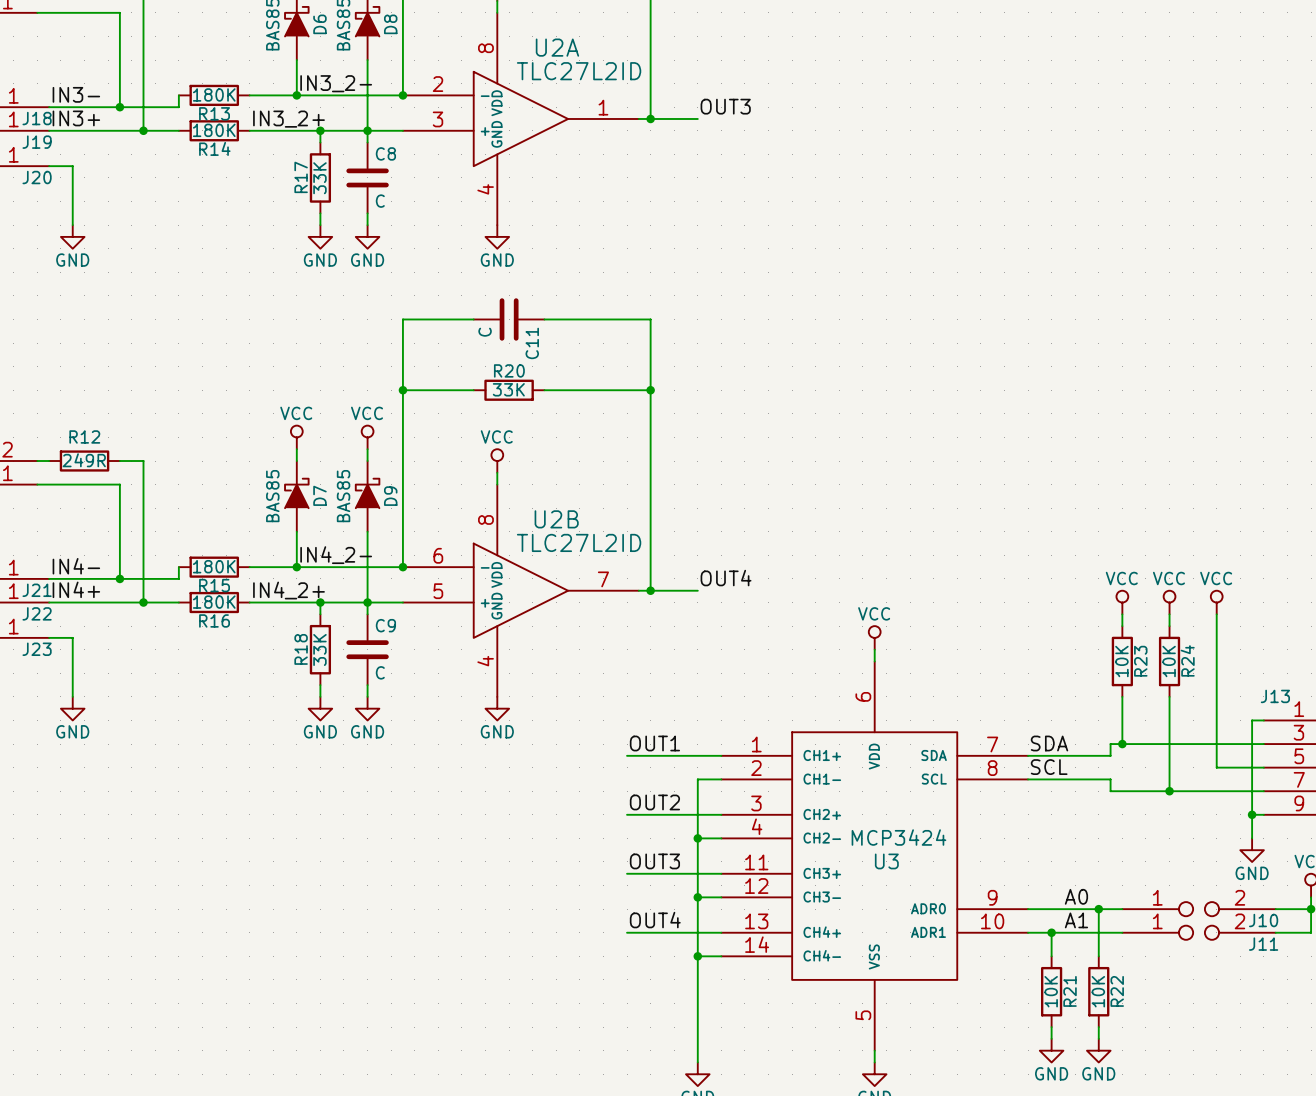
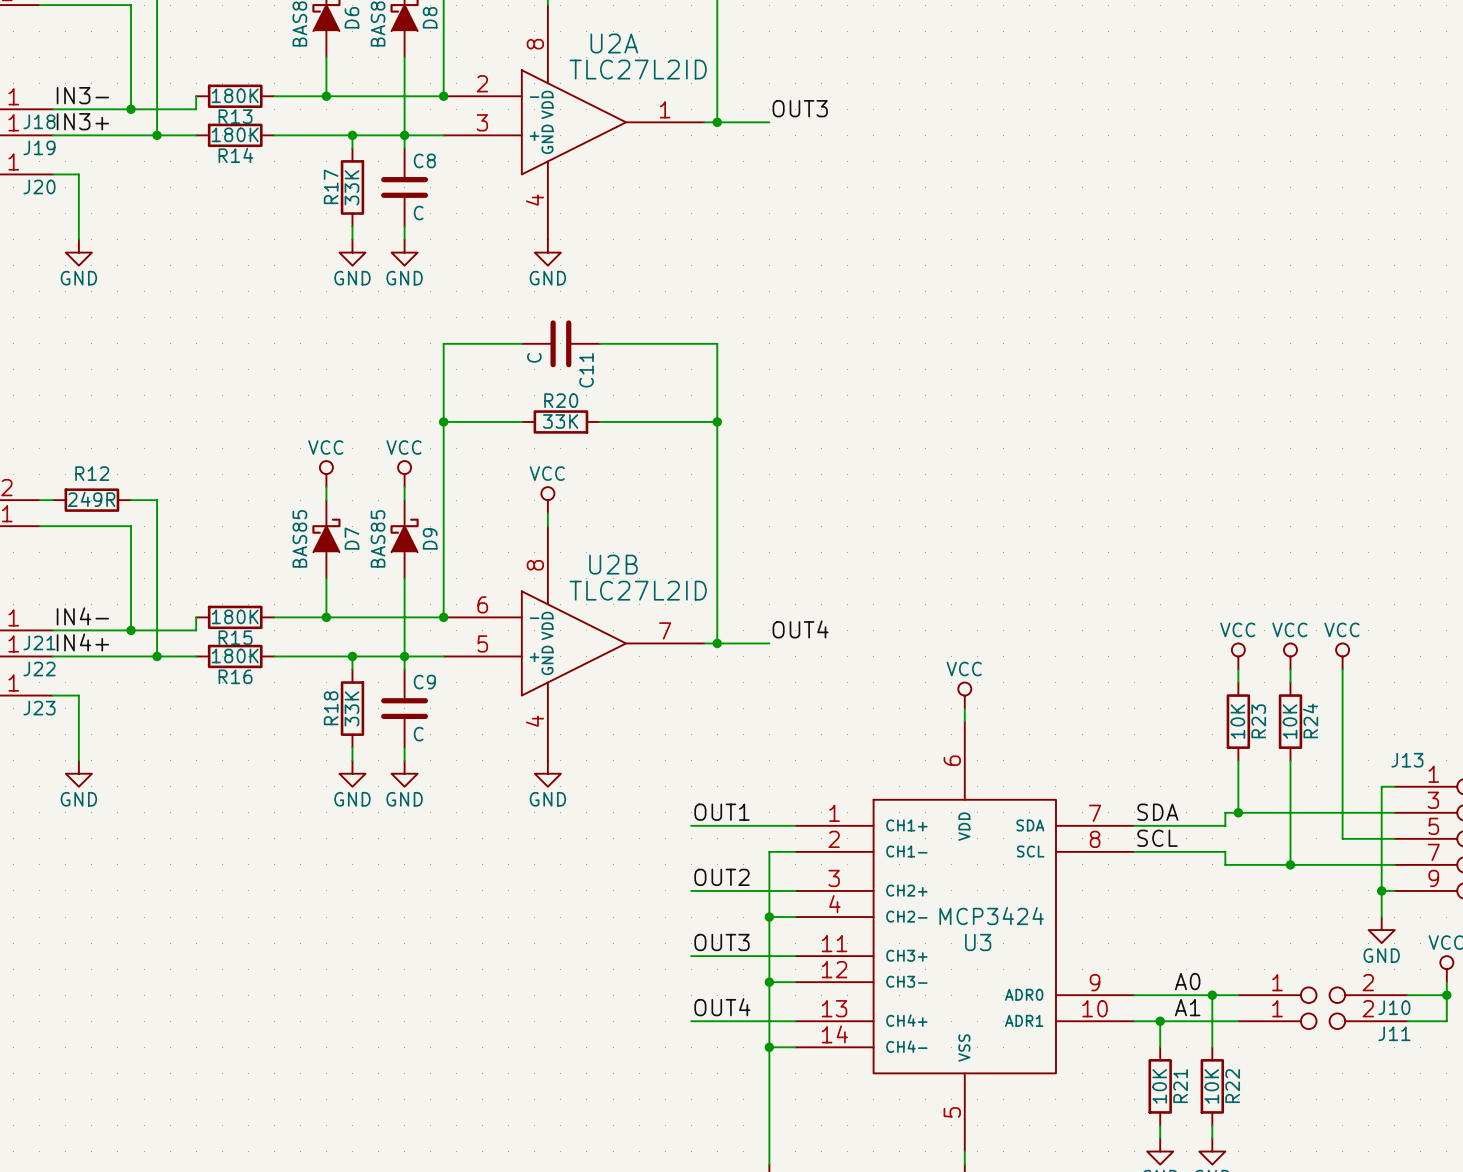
label: IN3_2- (336, 83) -> none
label: IN3_2+ (288, 119) -> none
label: IN4_2- (336, 555) -> none
label: IN4_2+ (288, 590) -> none

